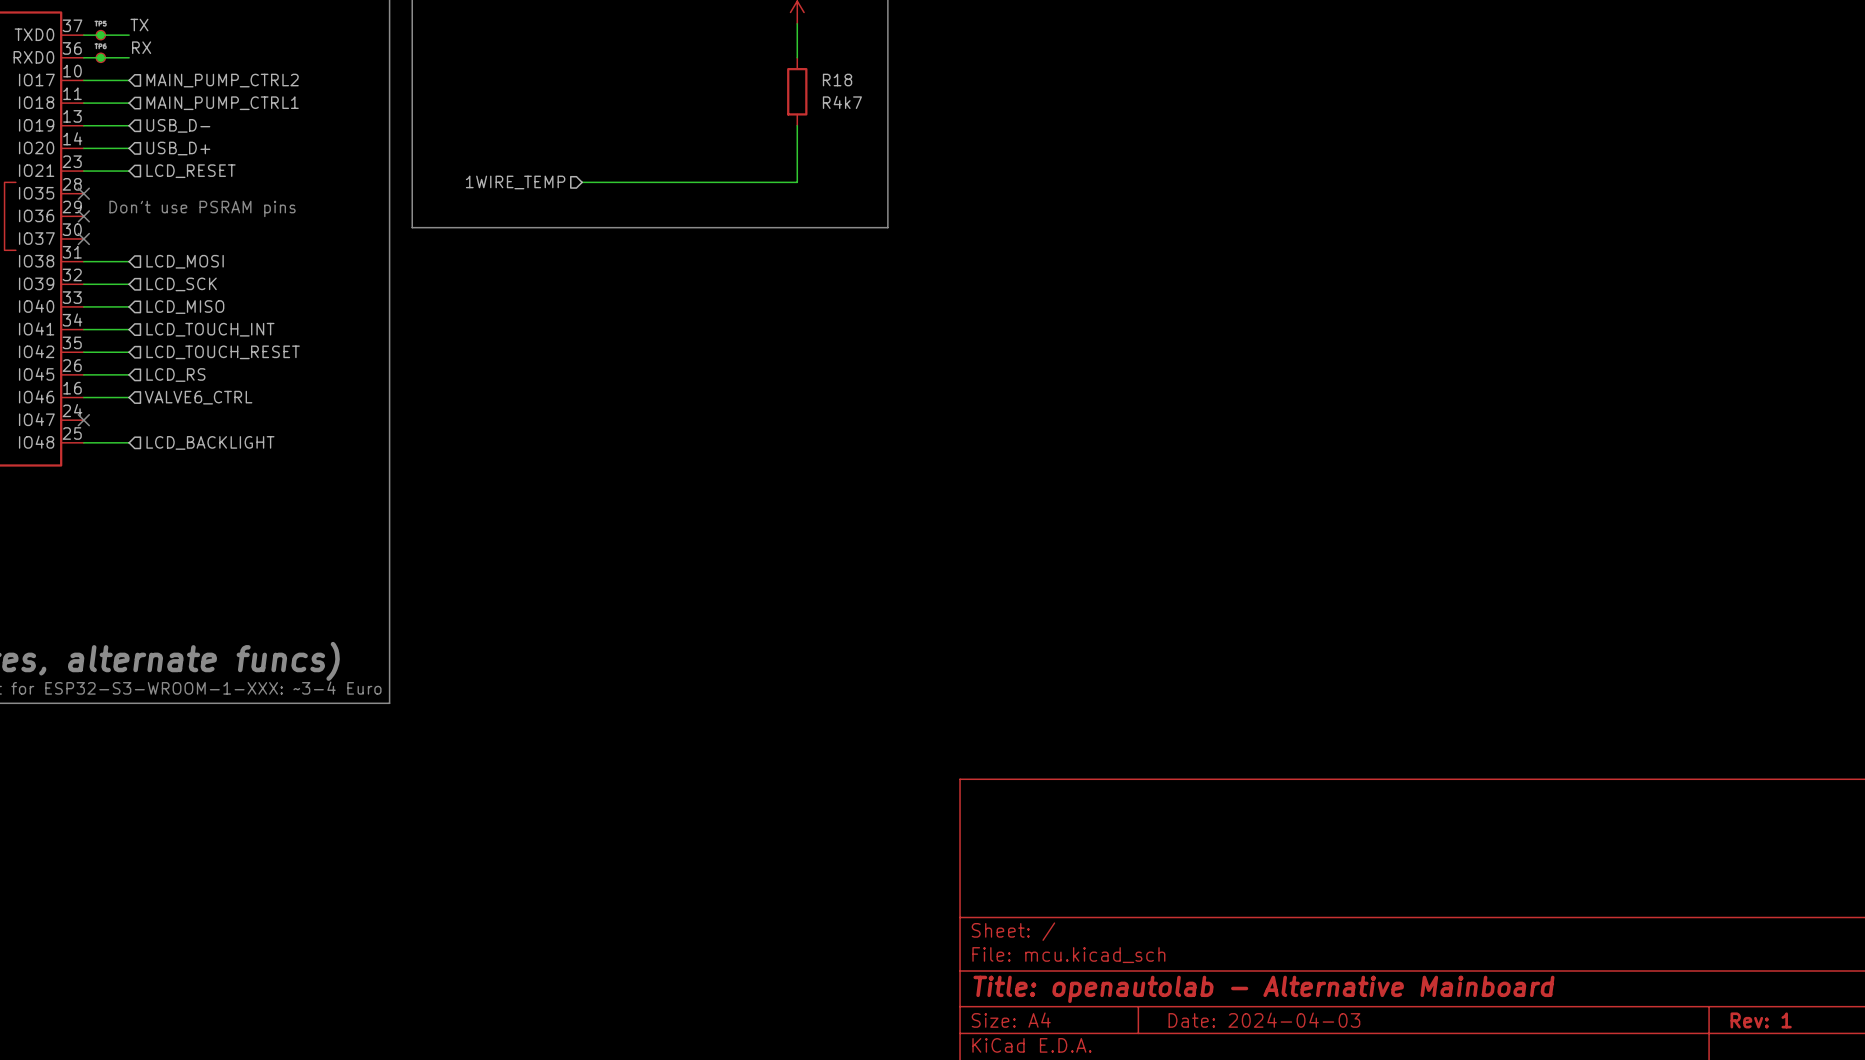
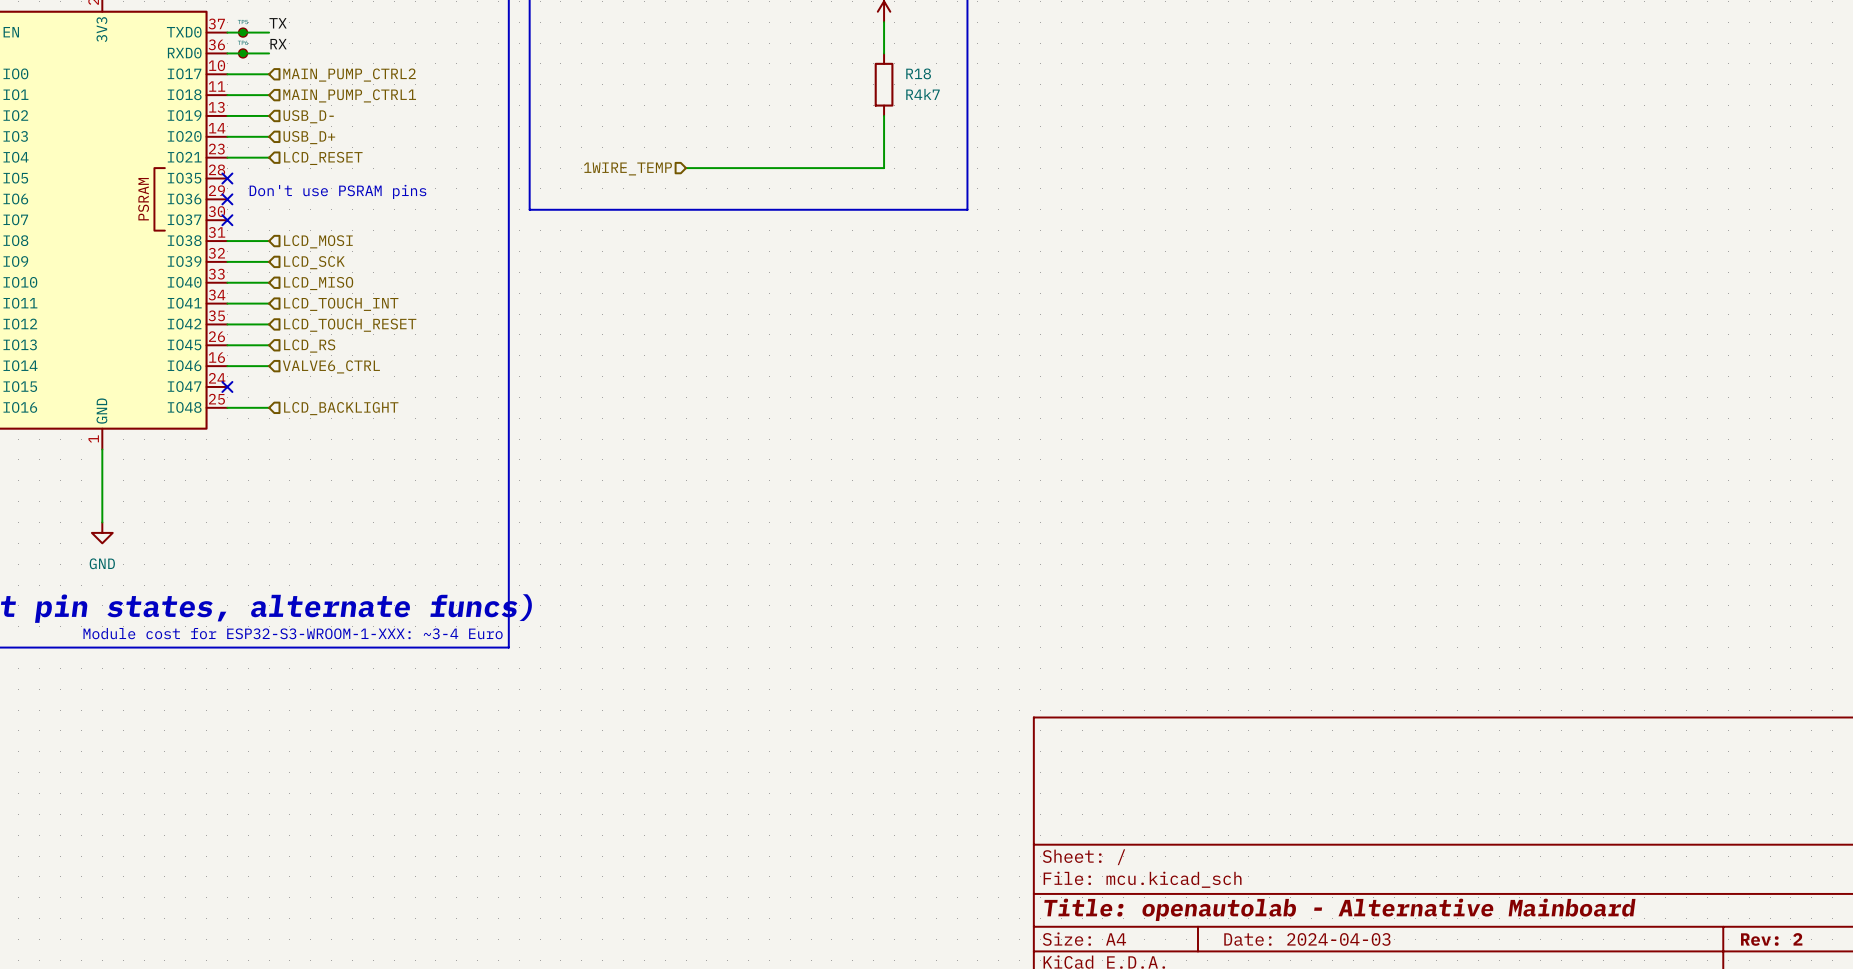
title block: Rev: 1 (1761, 1020) -> Rev: 2 (1771, 939)

